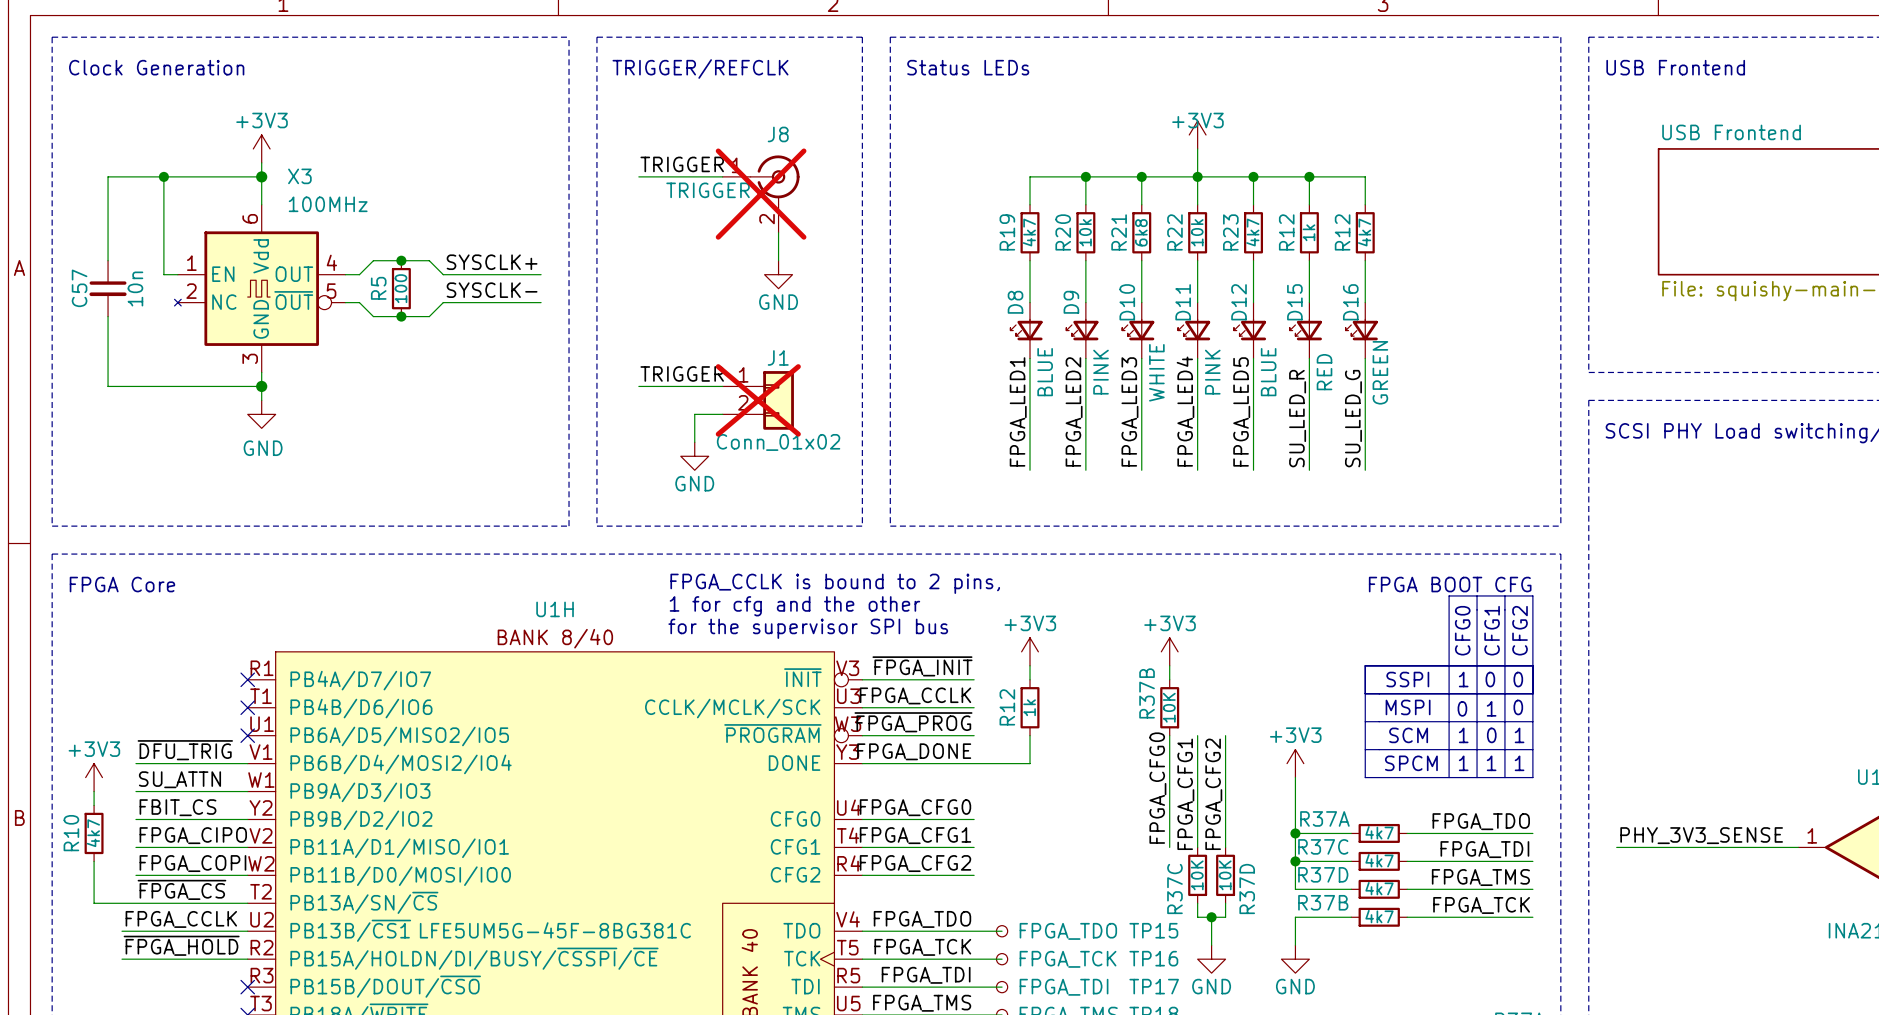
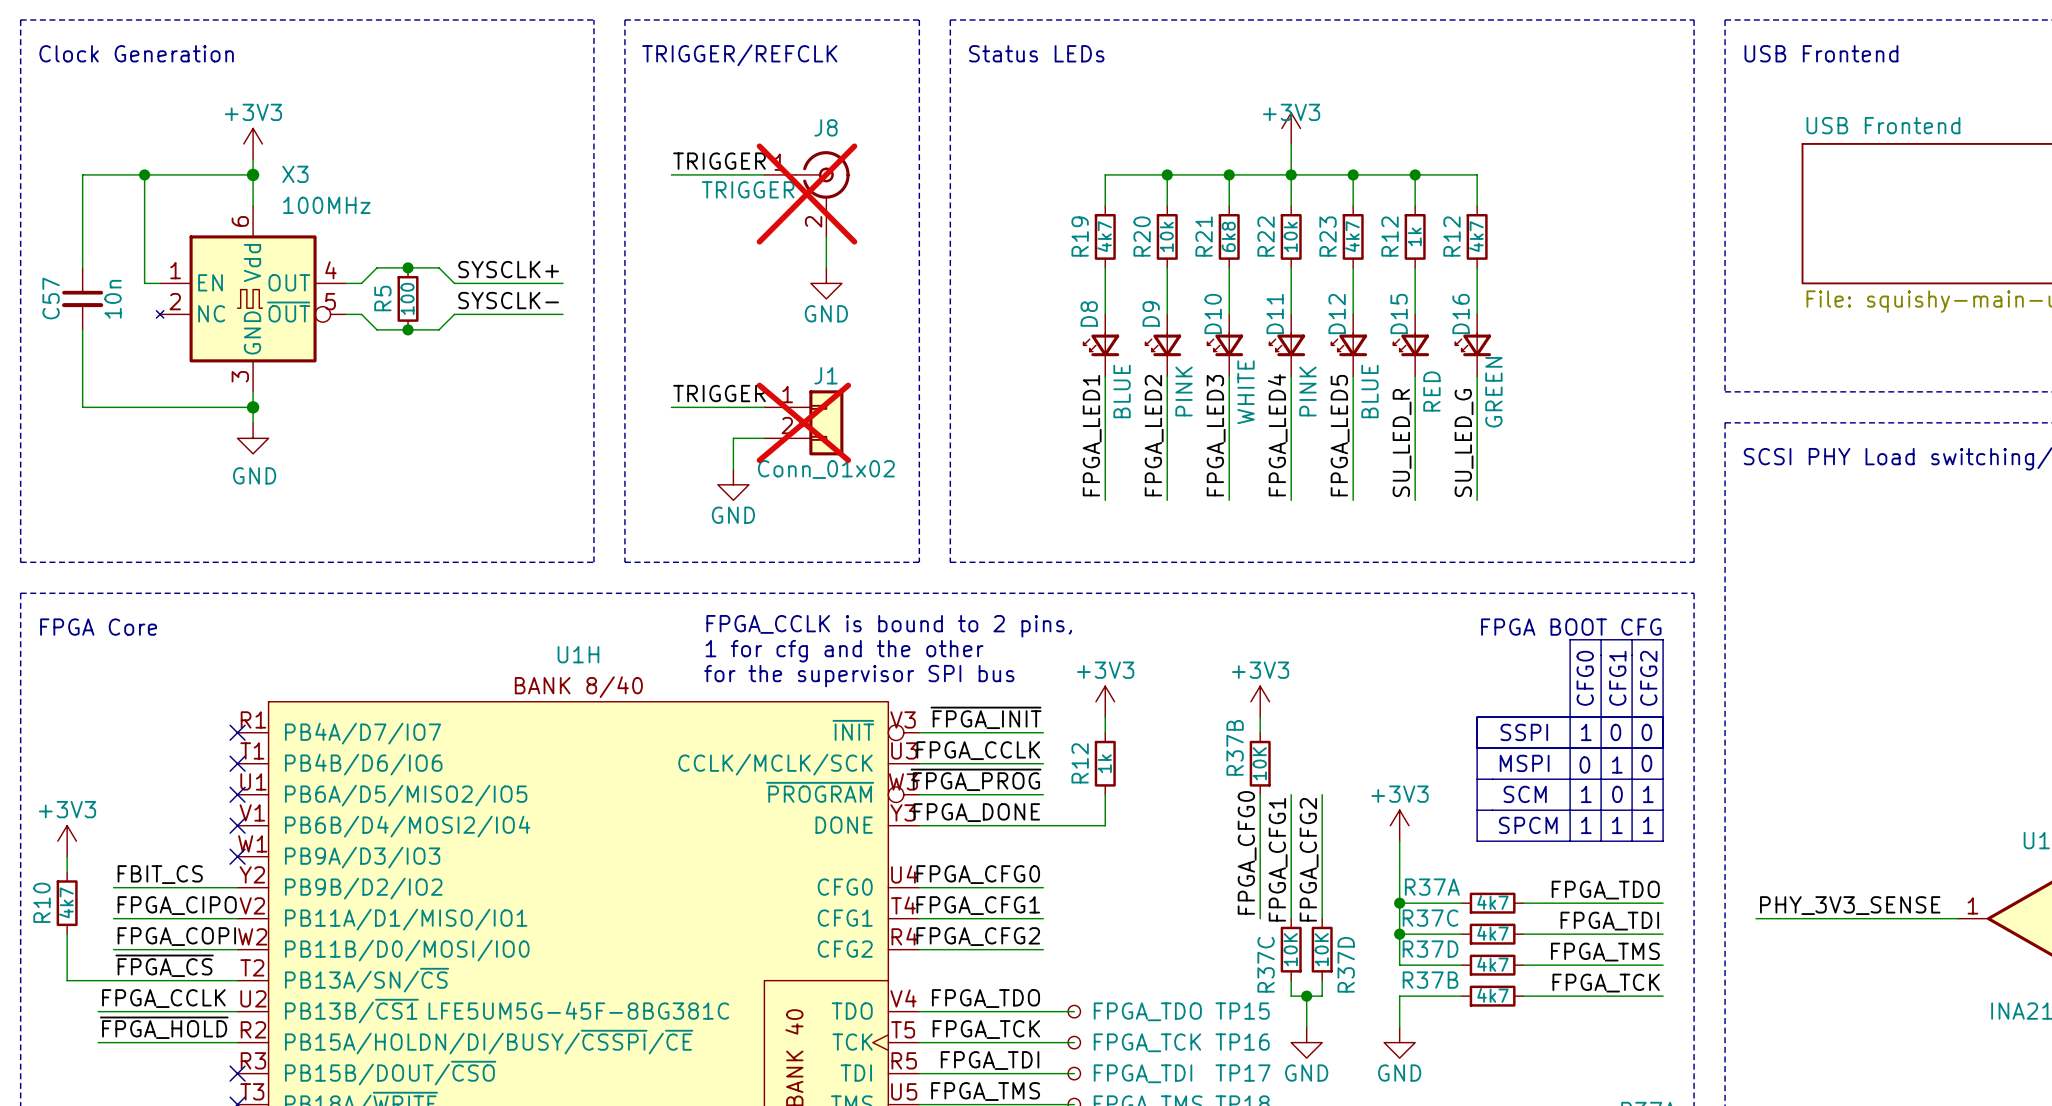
label: ~{DFU_TRIG} (185, 750) -> none
wire: (135, 763) (247, 763) -> none
no-connect mark: none -> (237, 825)
label: SU_ATTN (179, 779) -> none
wire: (135, 791) (247, 791) -> none
no-connect mark: none -> (237, 856)

